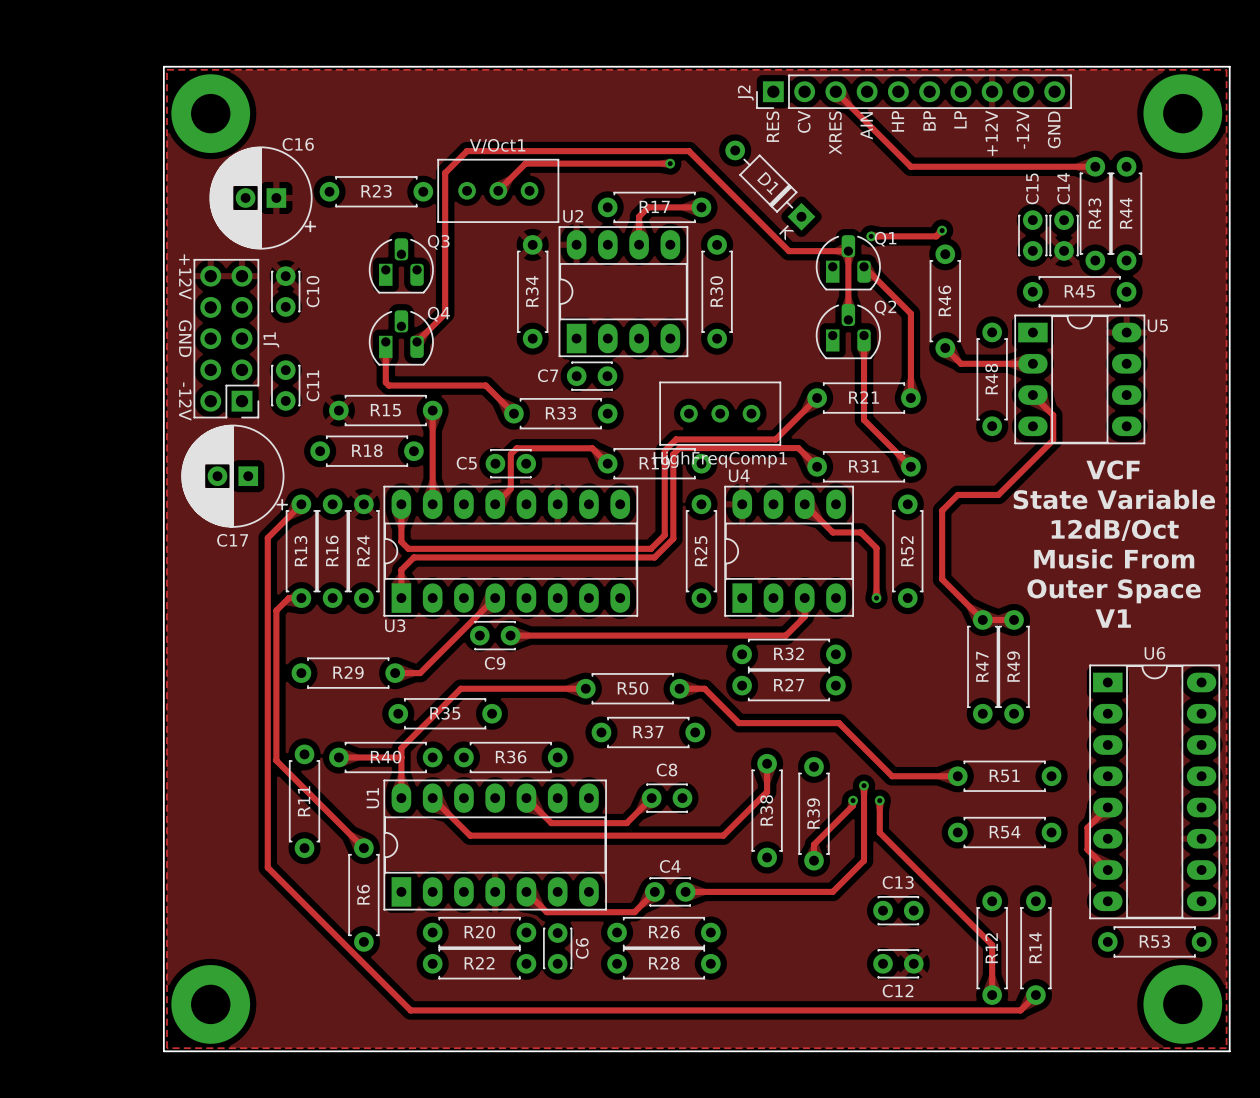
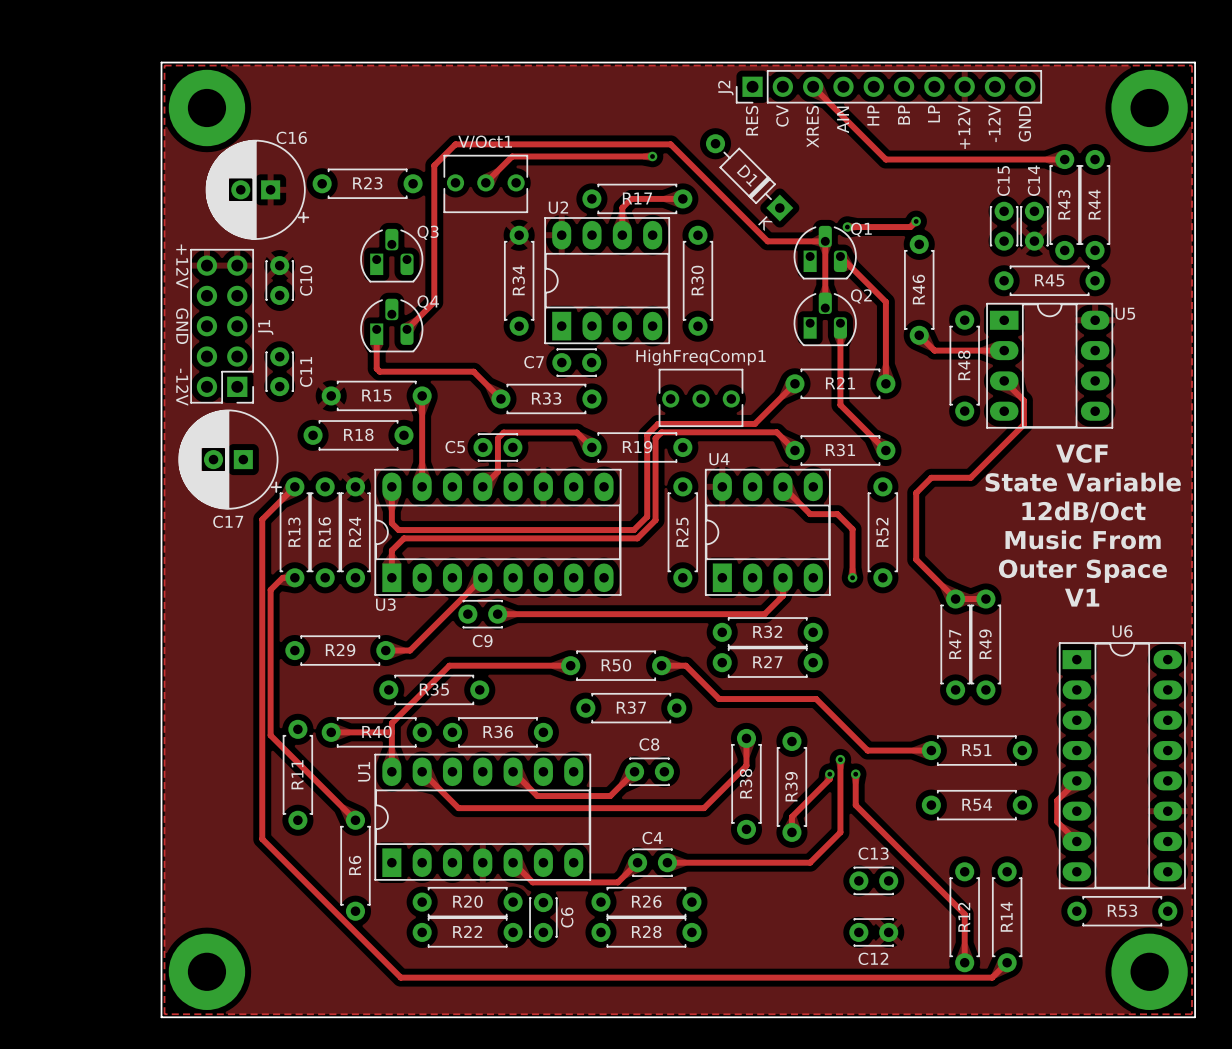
V/Oct1 footprint: [437, 158, 560, 223] -> [443, 154, 529, 213]
HighFreqComp1 footprint: [659, 381, 782, 446] -> [658, 368, 744, 427]
HighFreqComp1 name position: HighFreqComp1 (720, 459) -> HighFreqComp1 (701, 357)

